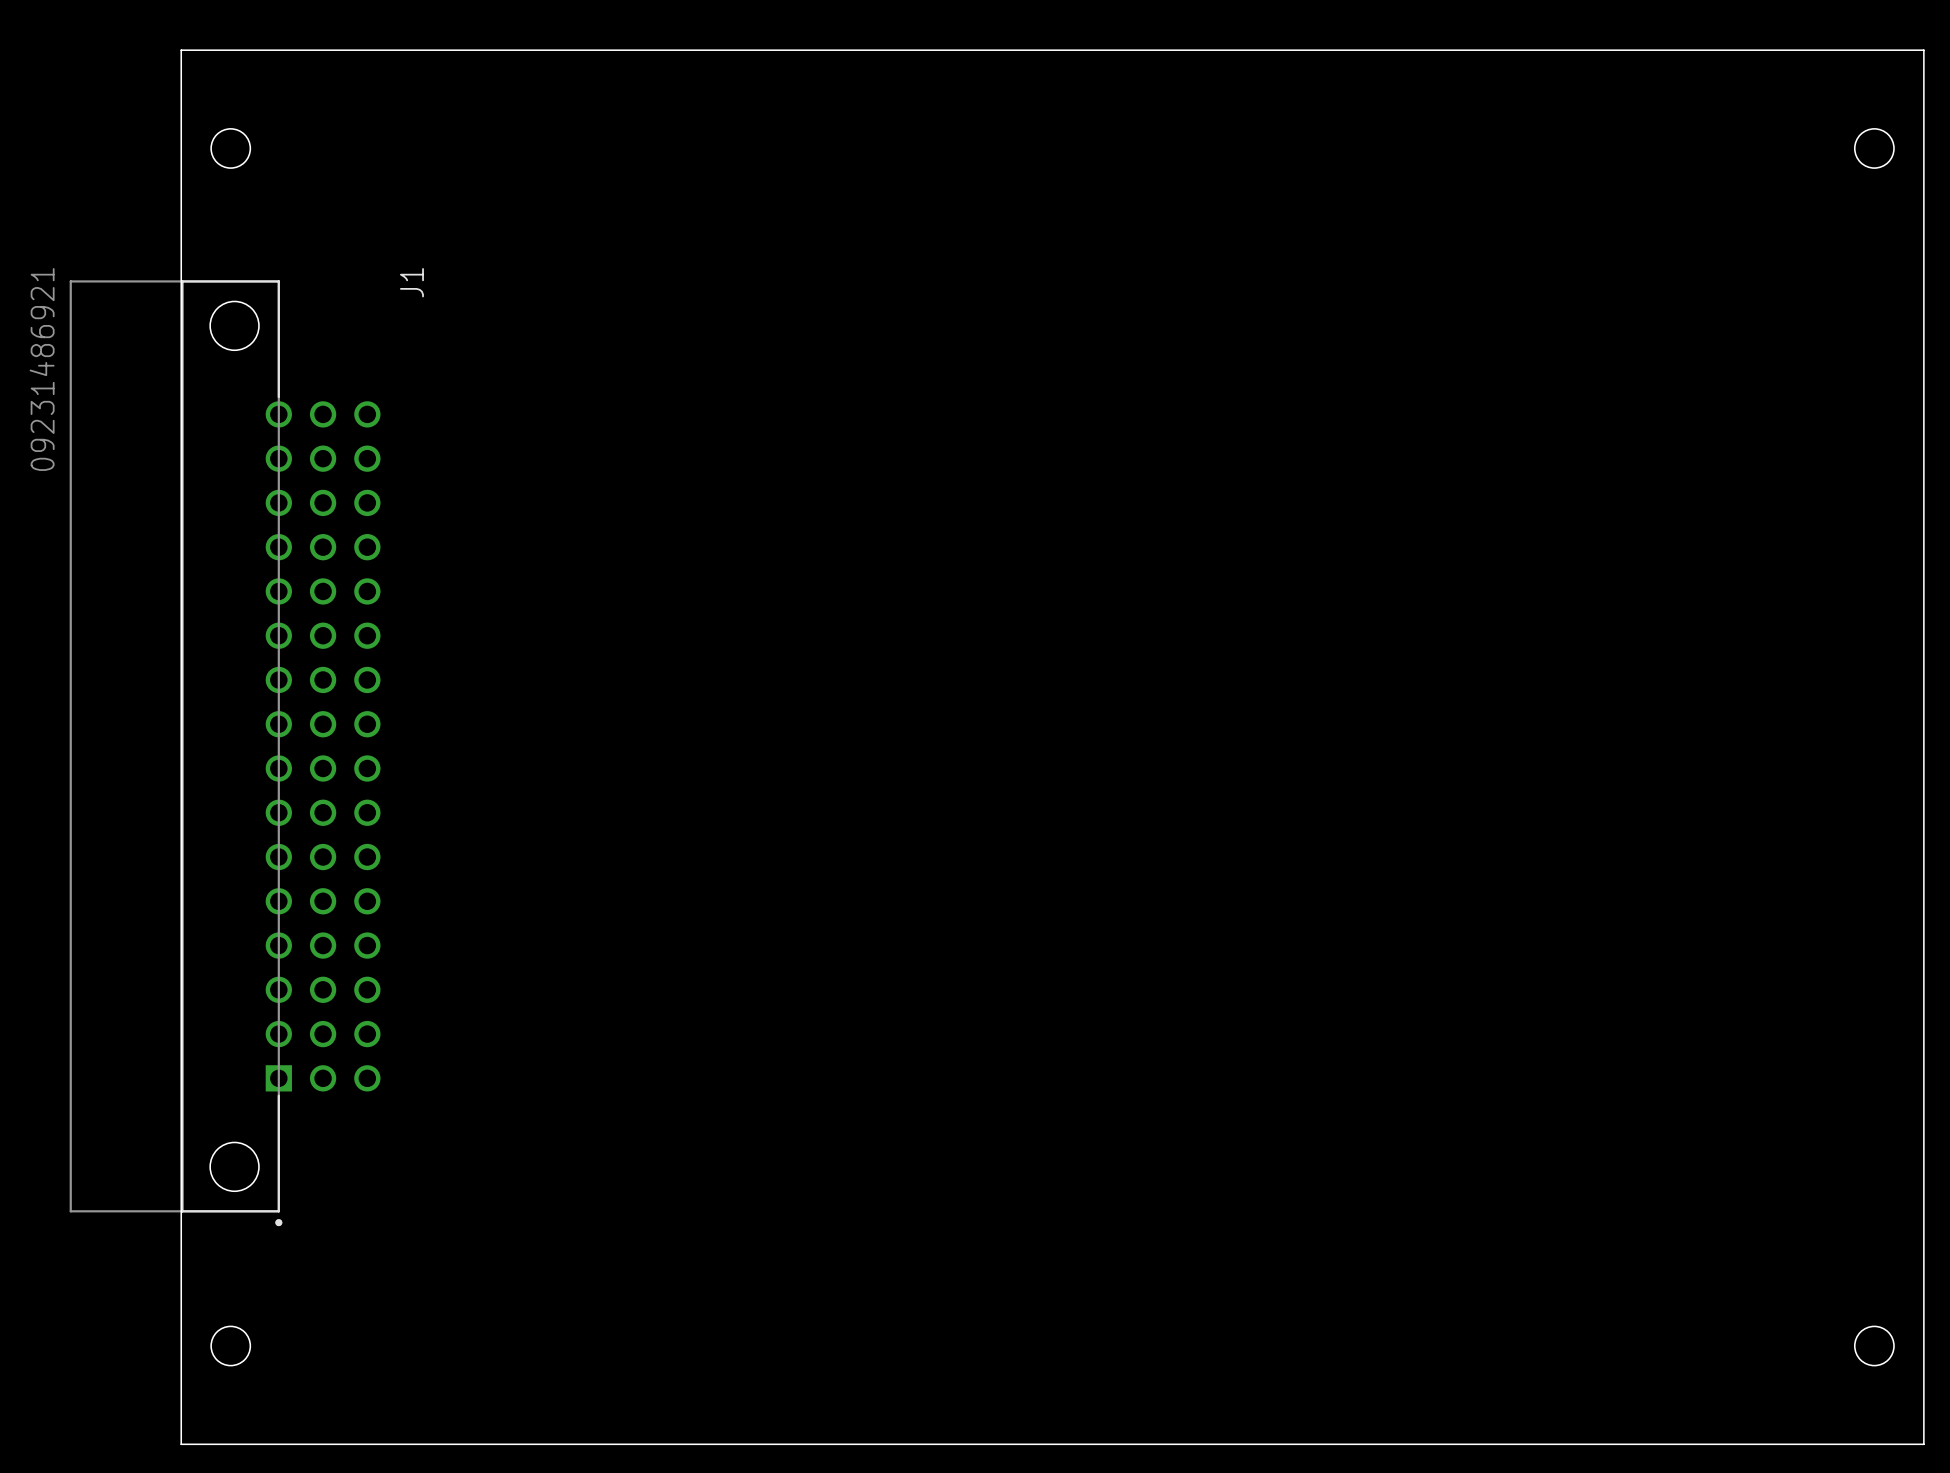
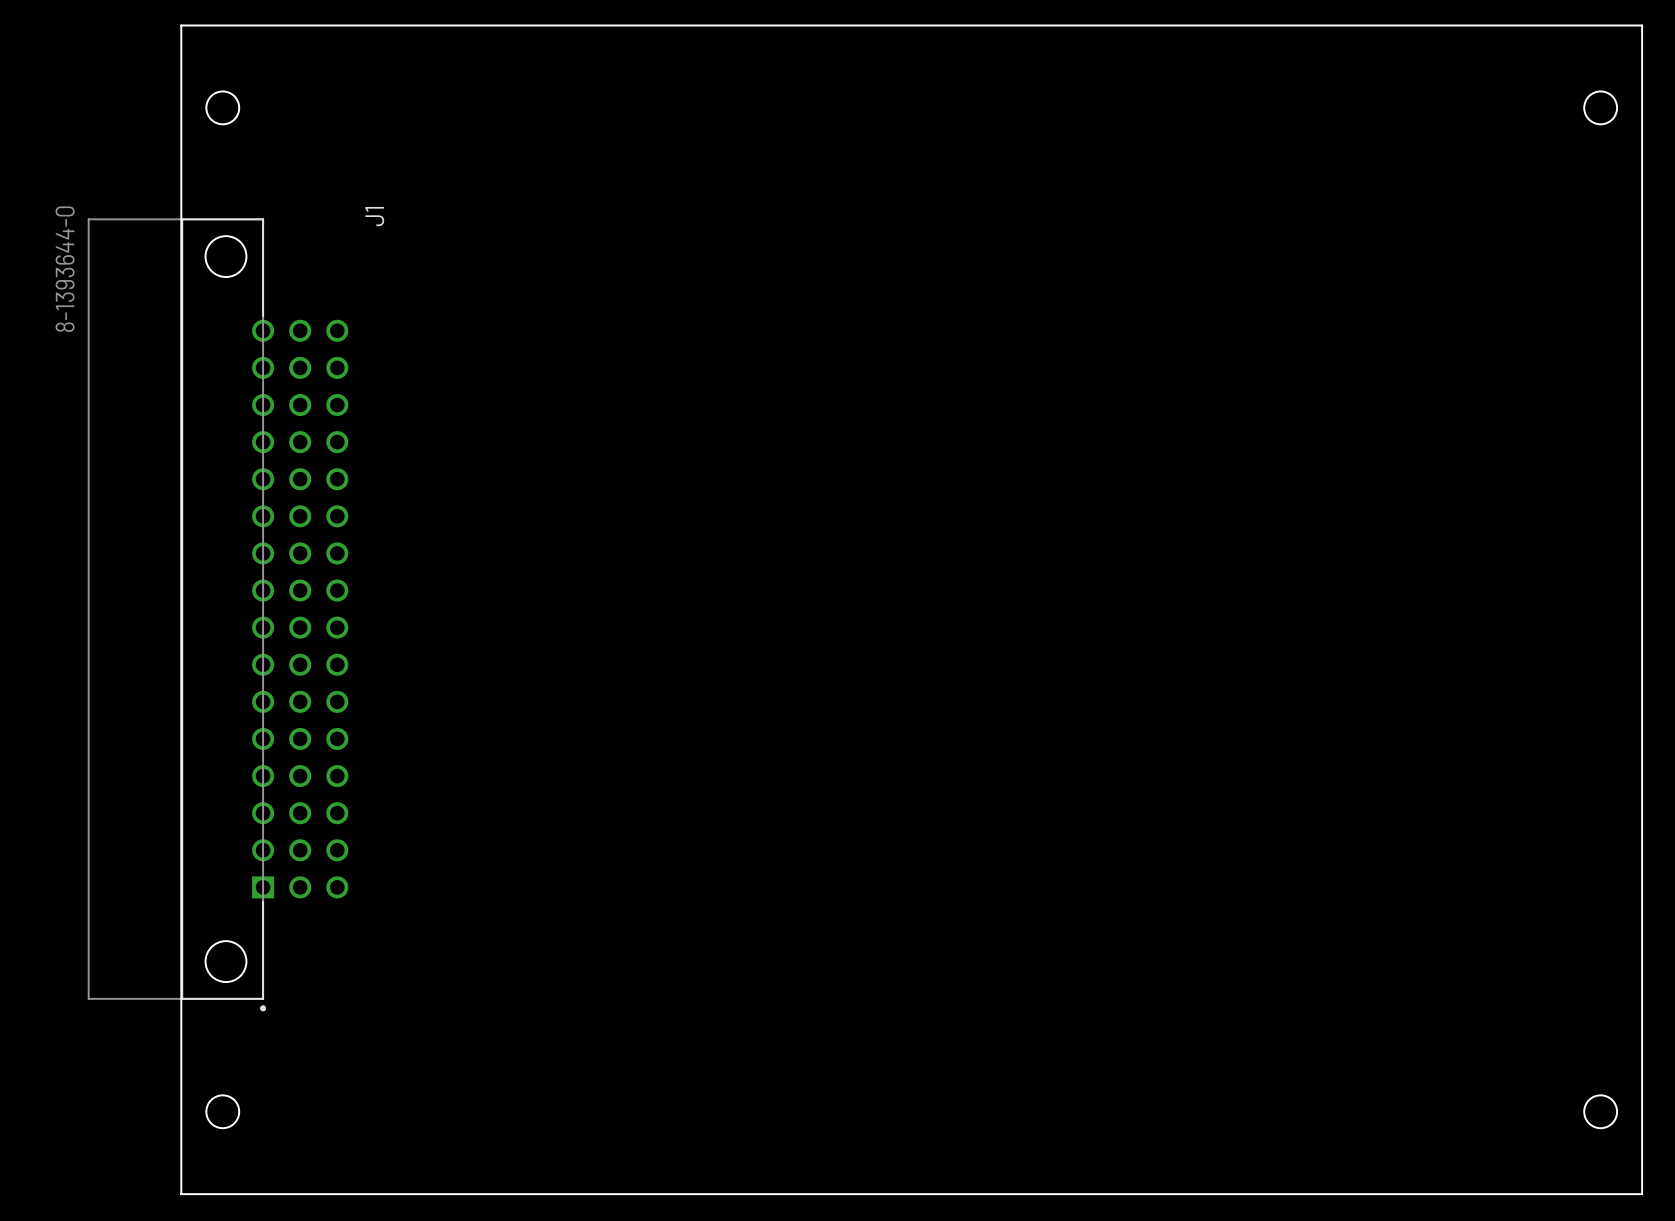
J1 value: 09231486921 (42, 369) -> 8-1393644-0 (65, 269)

